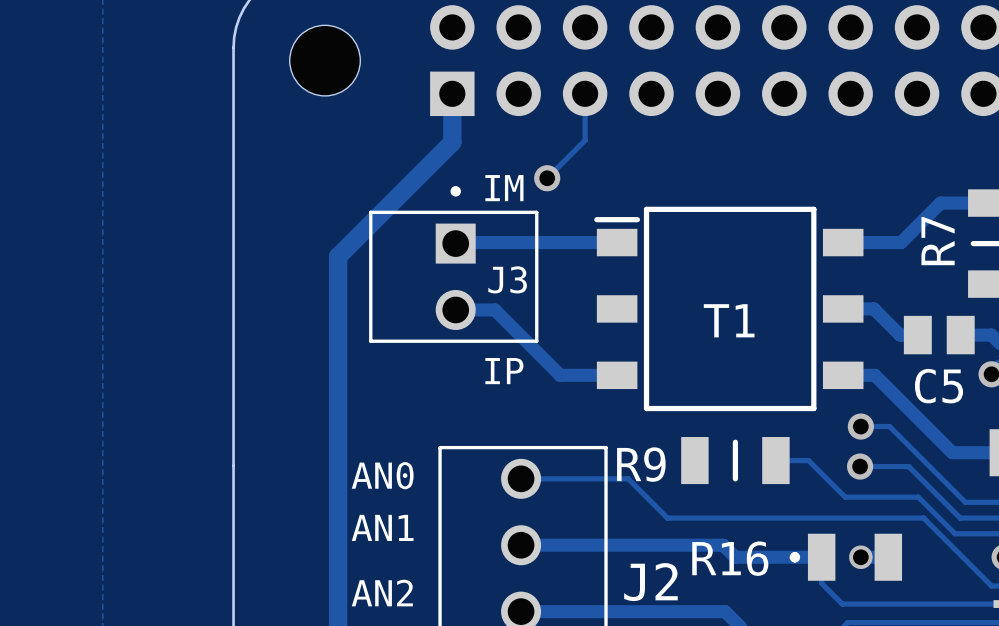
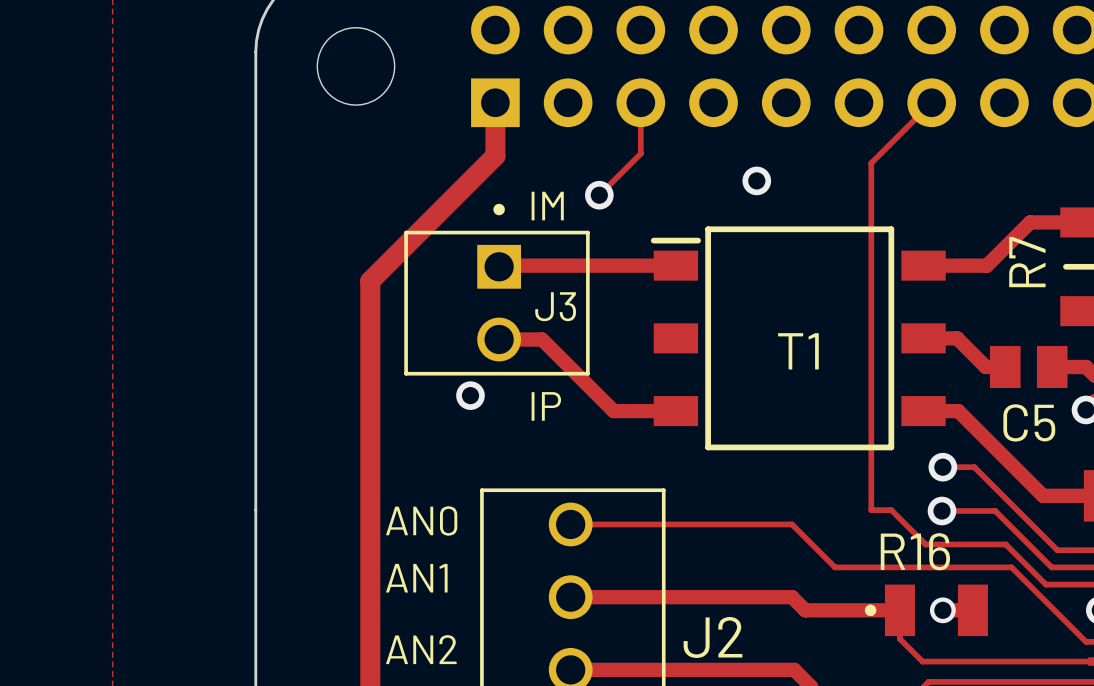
via: none -> (756, 180)
via: none -> (470, 395)
R9: (735, 460) -> none
track: (775, 460) (808, 460) (813, 465) -> (931, 102) (871, 163) (871, 510) (891, 510)
track: (628, 478) (667, 518) (762, 518) -> (688, 524) (792, 524) (835, 567)
R16 name position: R16 (730, 558) -> R16 (915, 551)

